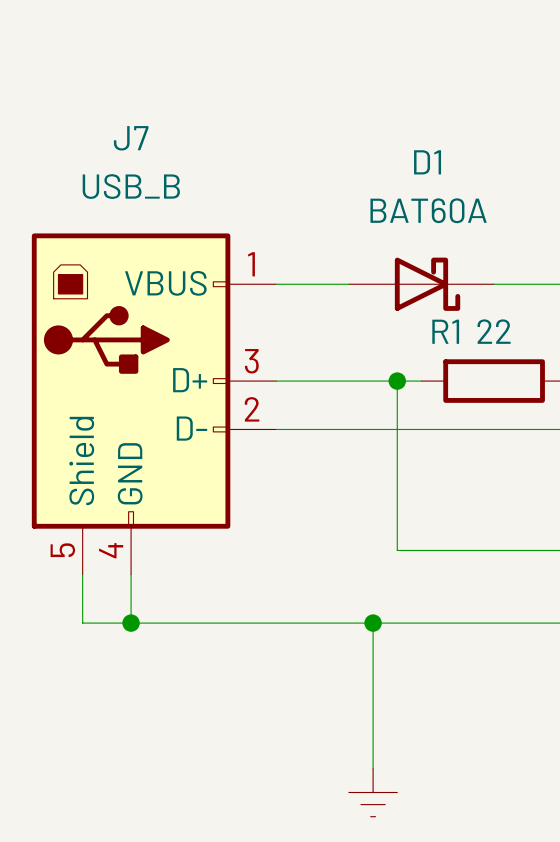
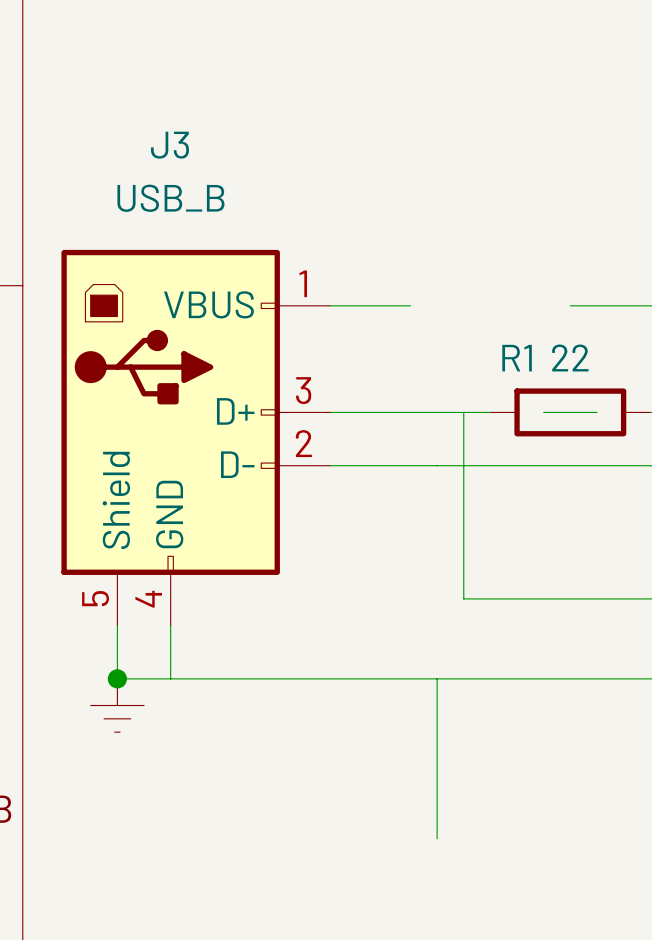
J7 name: J7 (131, 138) -> J3 (169, 145)
D1: BAT60A (421, 284) -> none
junction: (397, 381) -> none
wire: none -> (543, 412) (596, 412)
junction position: (131, 623) -> (117, 678)
junction: (373, 623) -> none
power symbol position: (373, 792) -> (117, 705)

